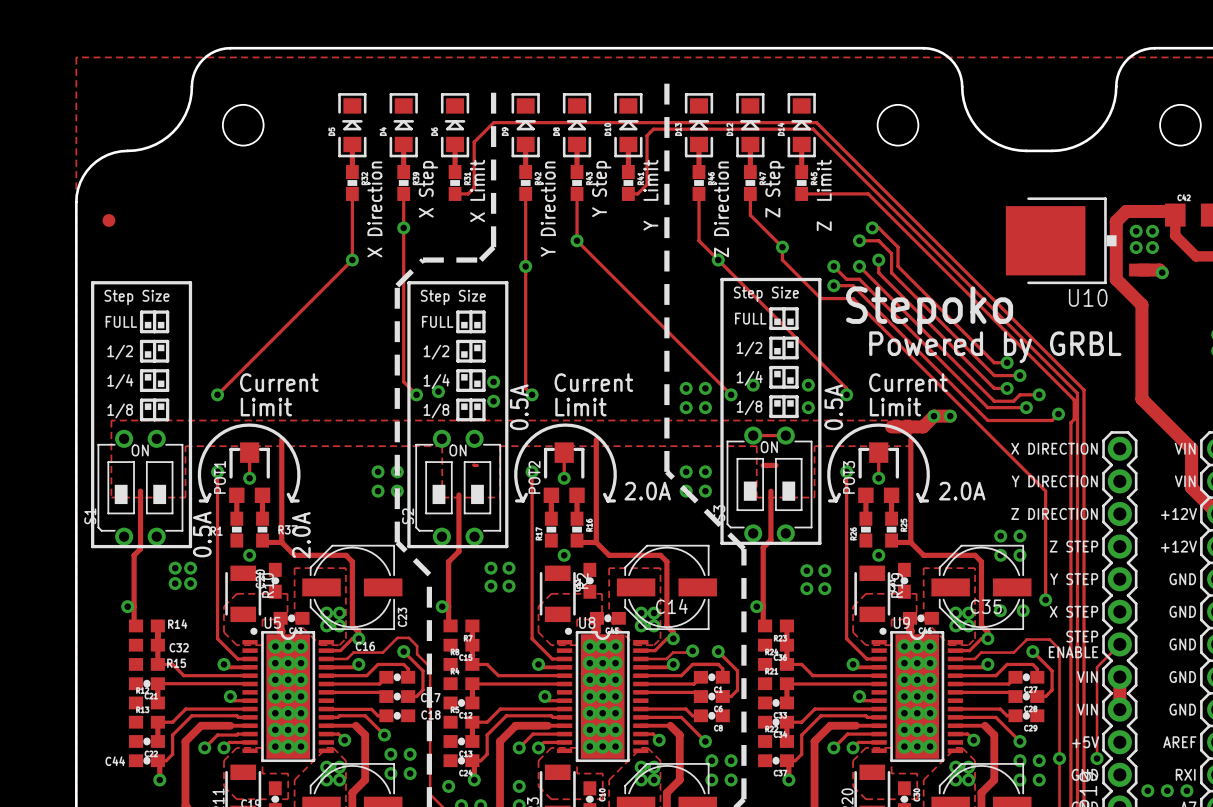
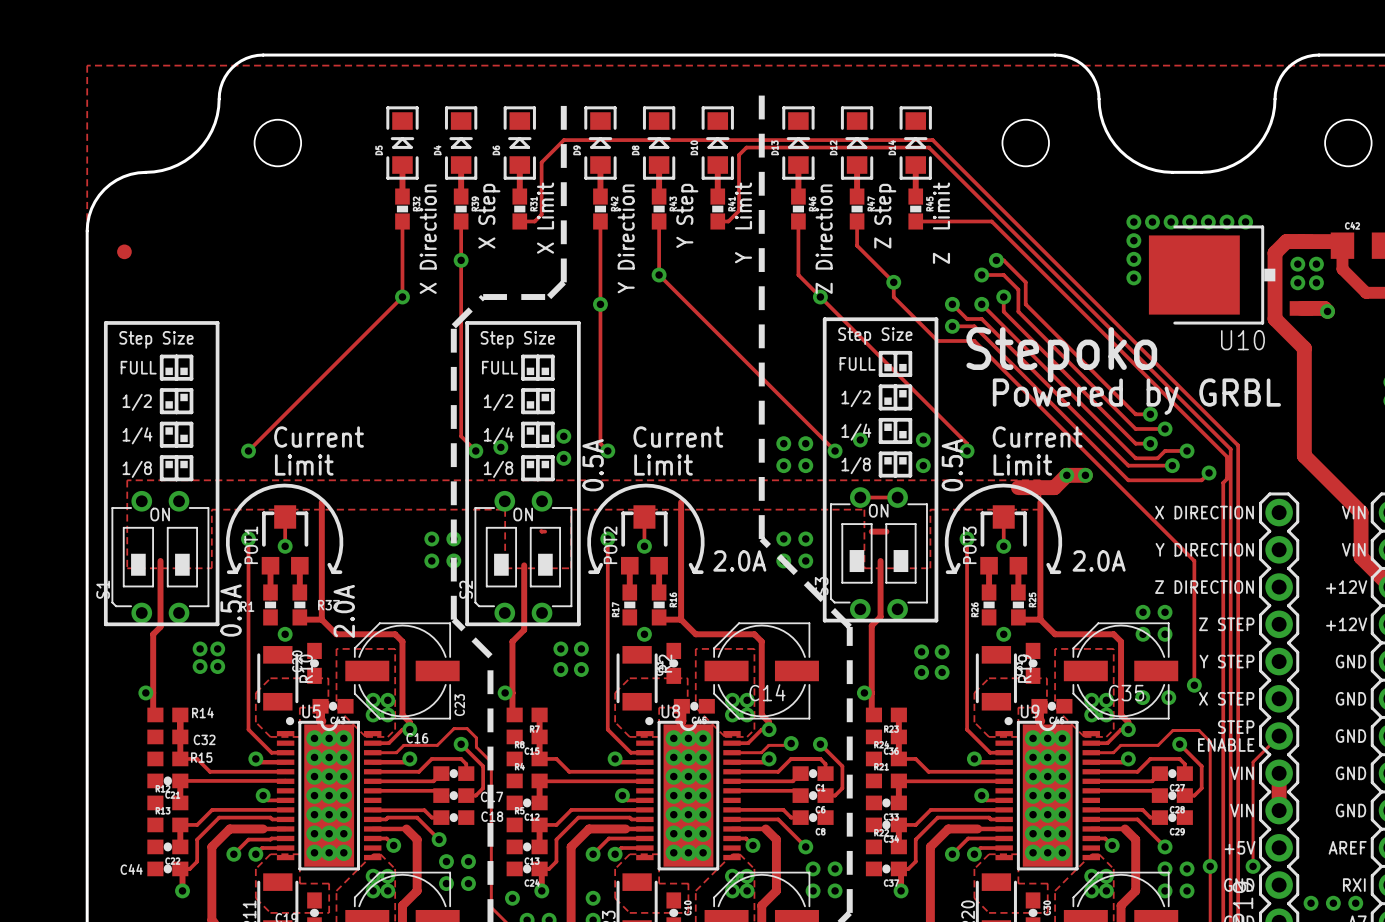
via: none -> (1133, 222)
via: none -> (1152, 222)
via: none -> (1171, 222)
via: none -> (1189, 222)
via: none -> (1208, 222)
via: none -> (1226, 222)
via: none -> (1245, 222)
via: none -> (1133, 240)
via: none -> (1133, 259)
via: none -> (1133, 277)

